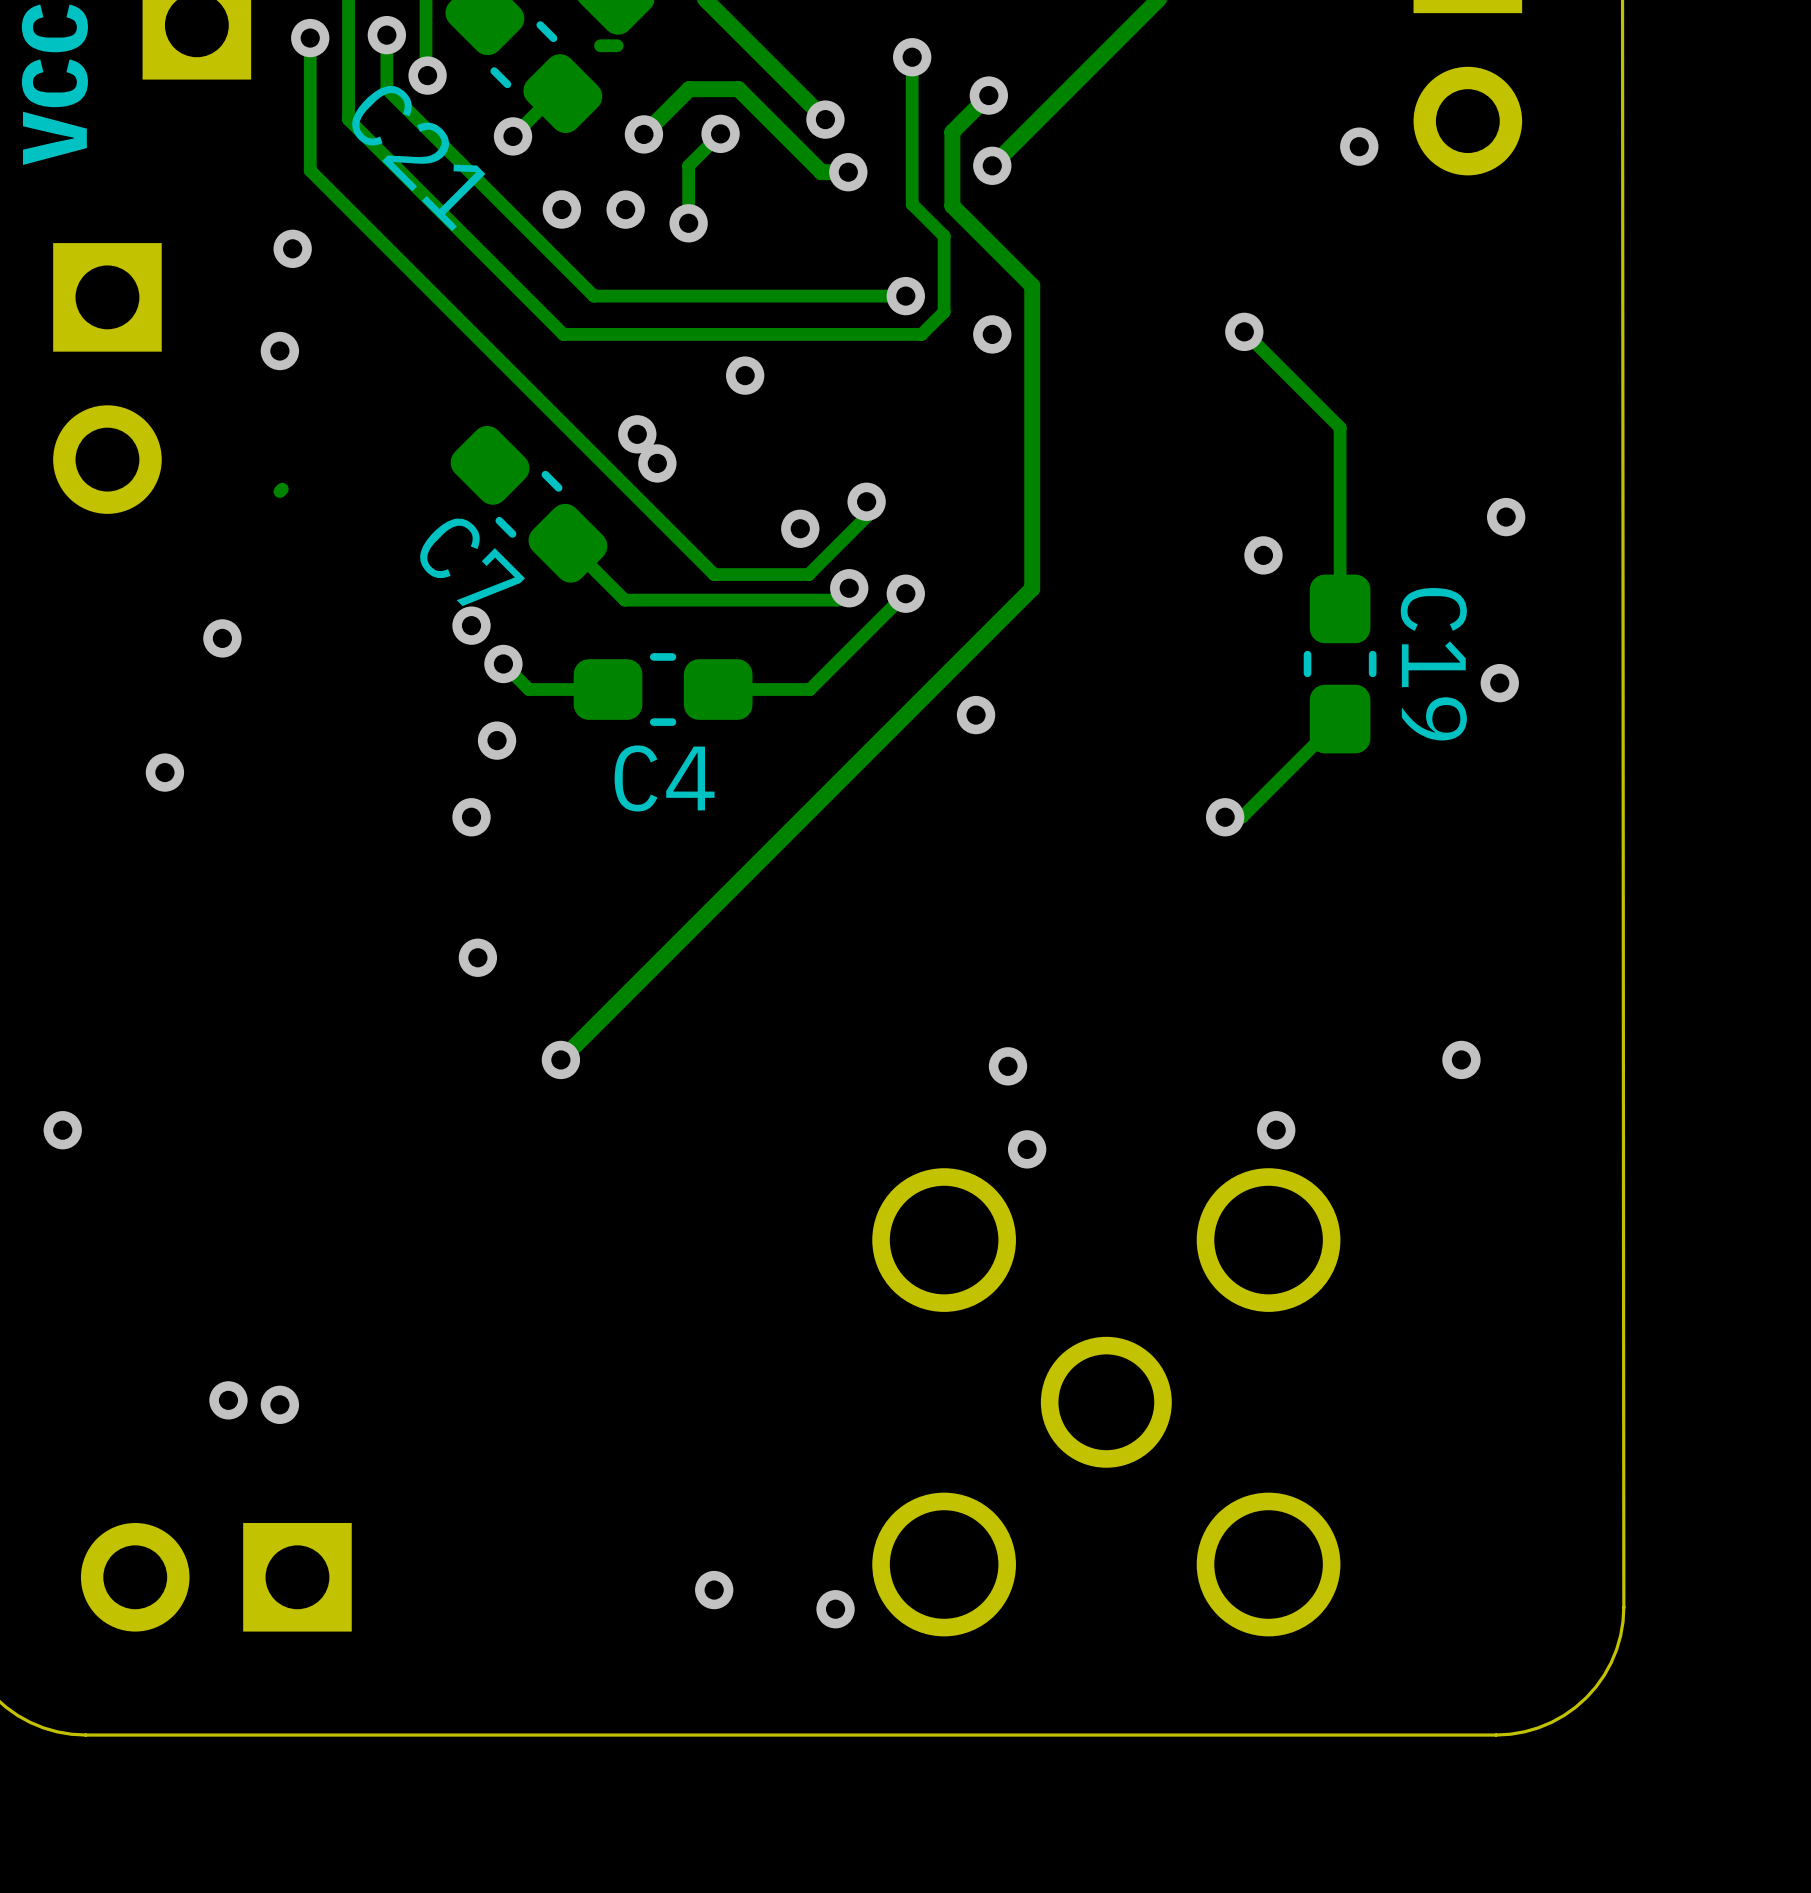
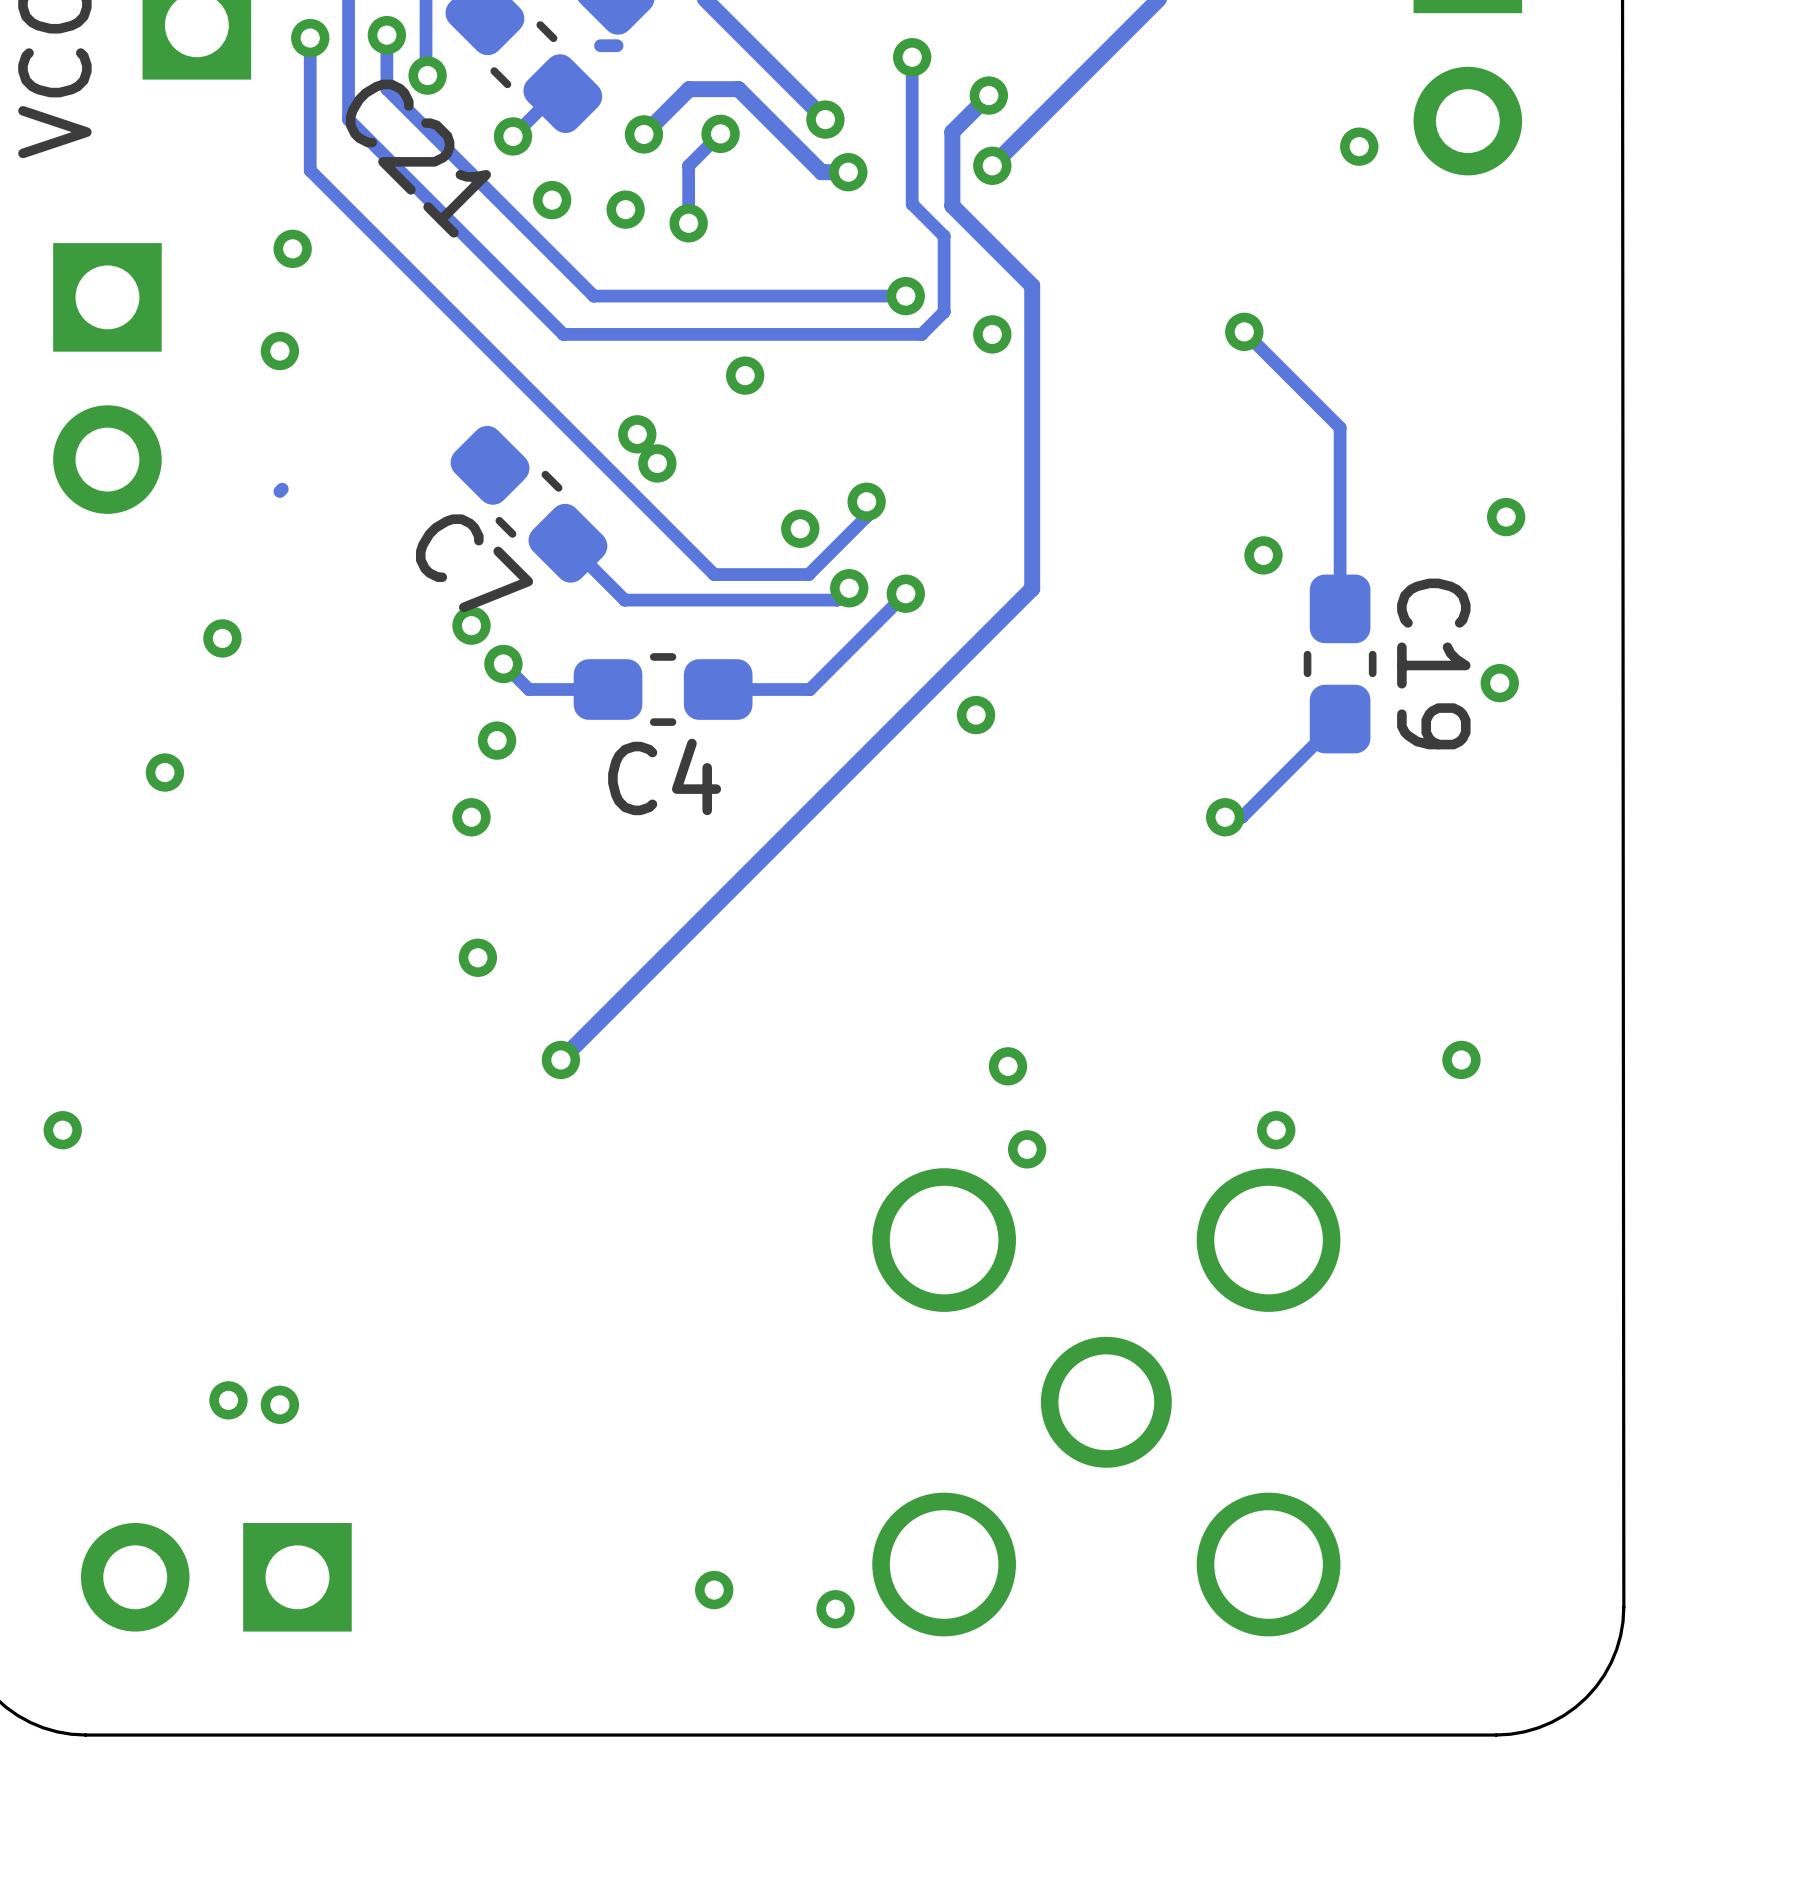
via position: (561, 209) -> (552, 200)

